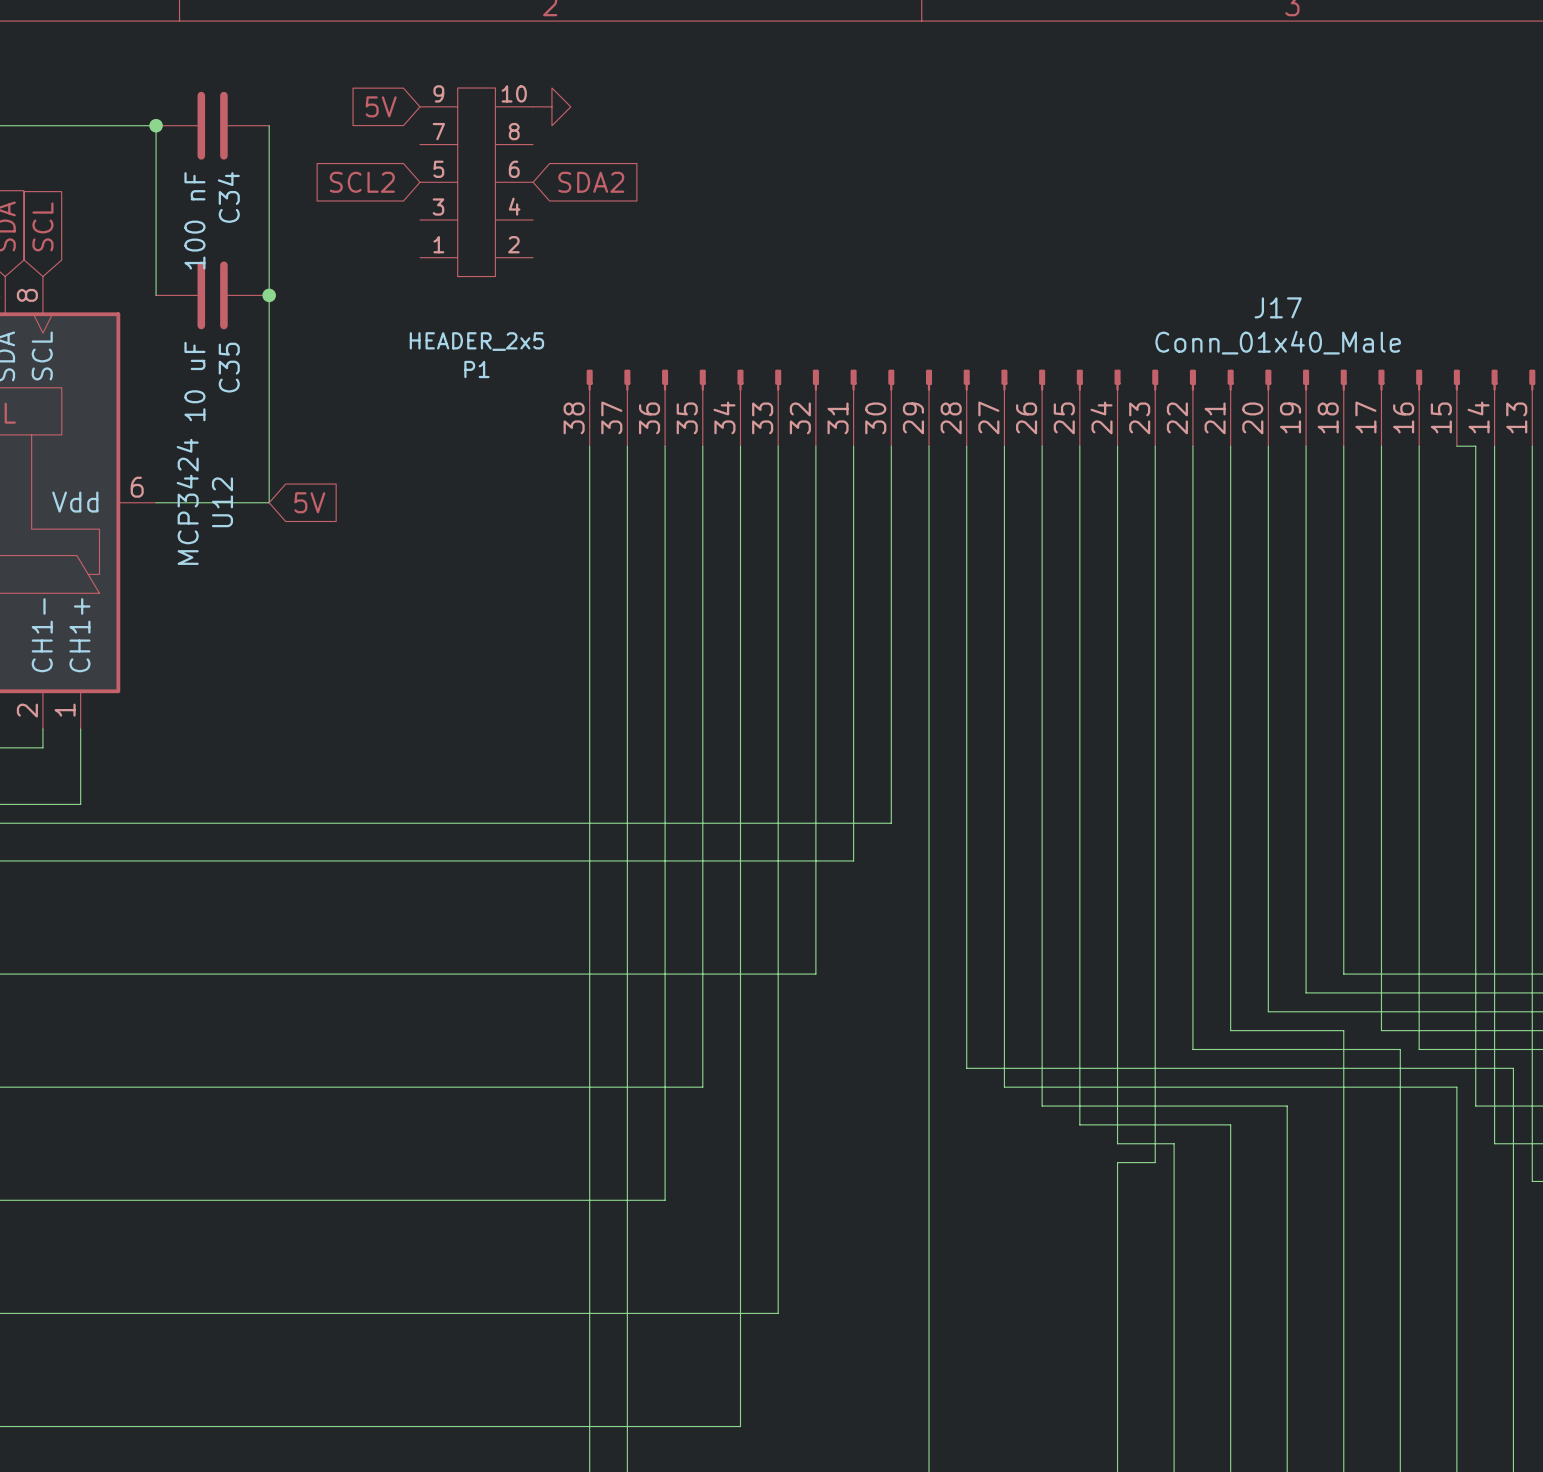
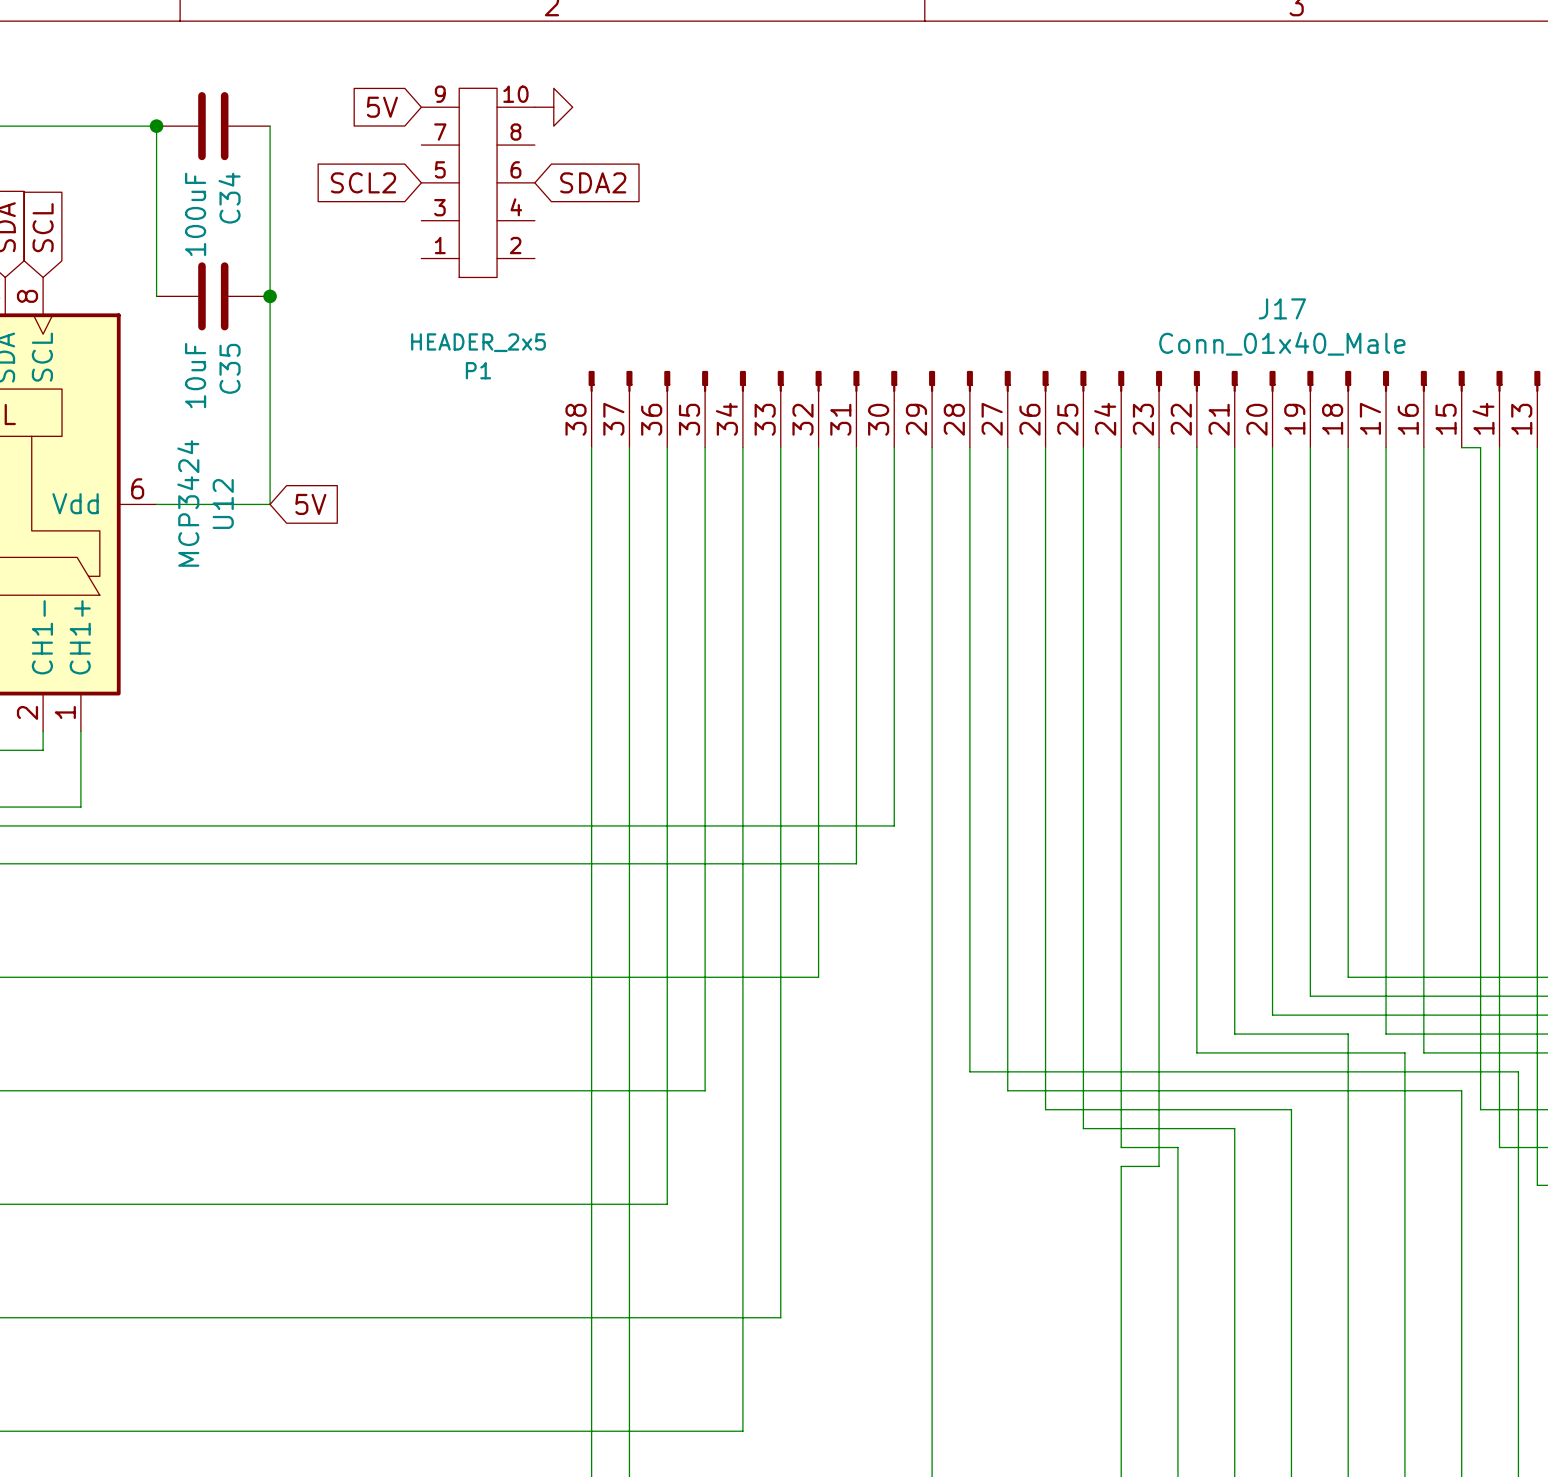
C34 value: 100 nF (194, 220) -> 100uF (195, 214)
C35 value: 10 uF (194, 381) -> 10uF (195, 375)

